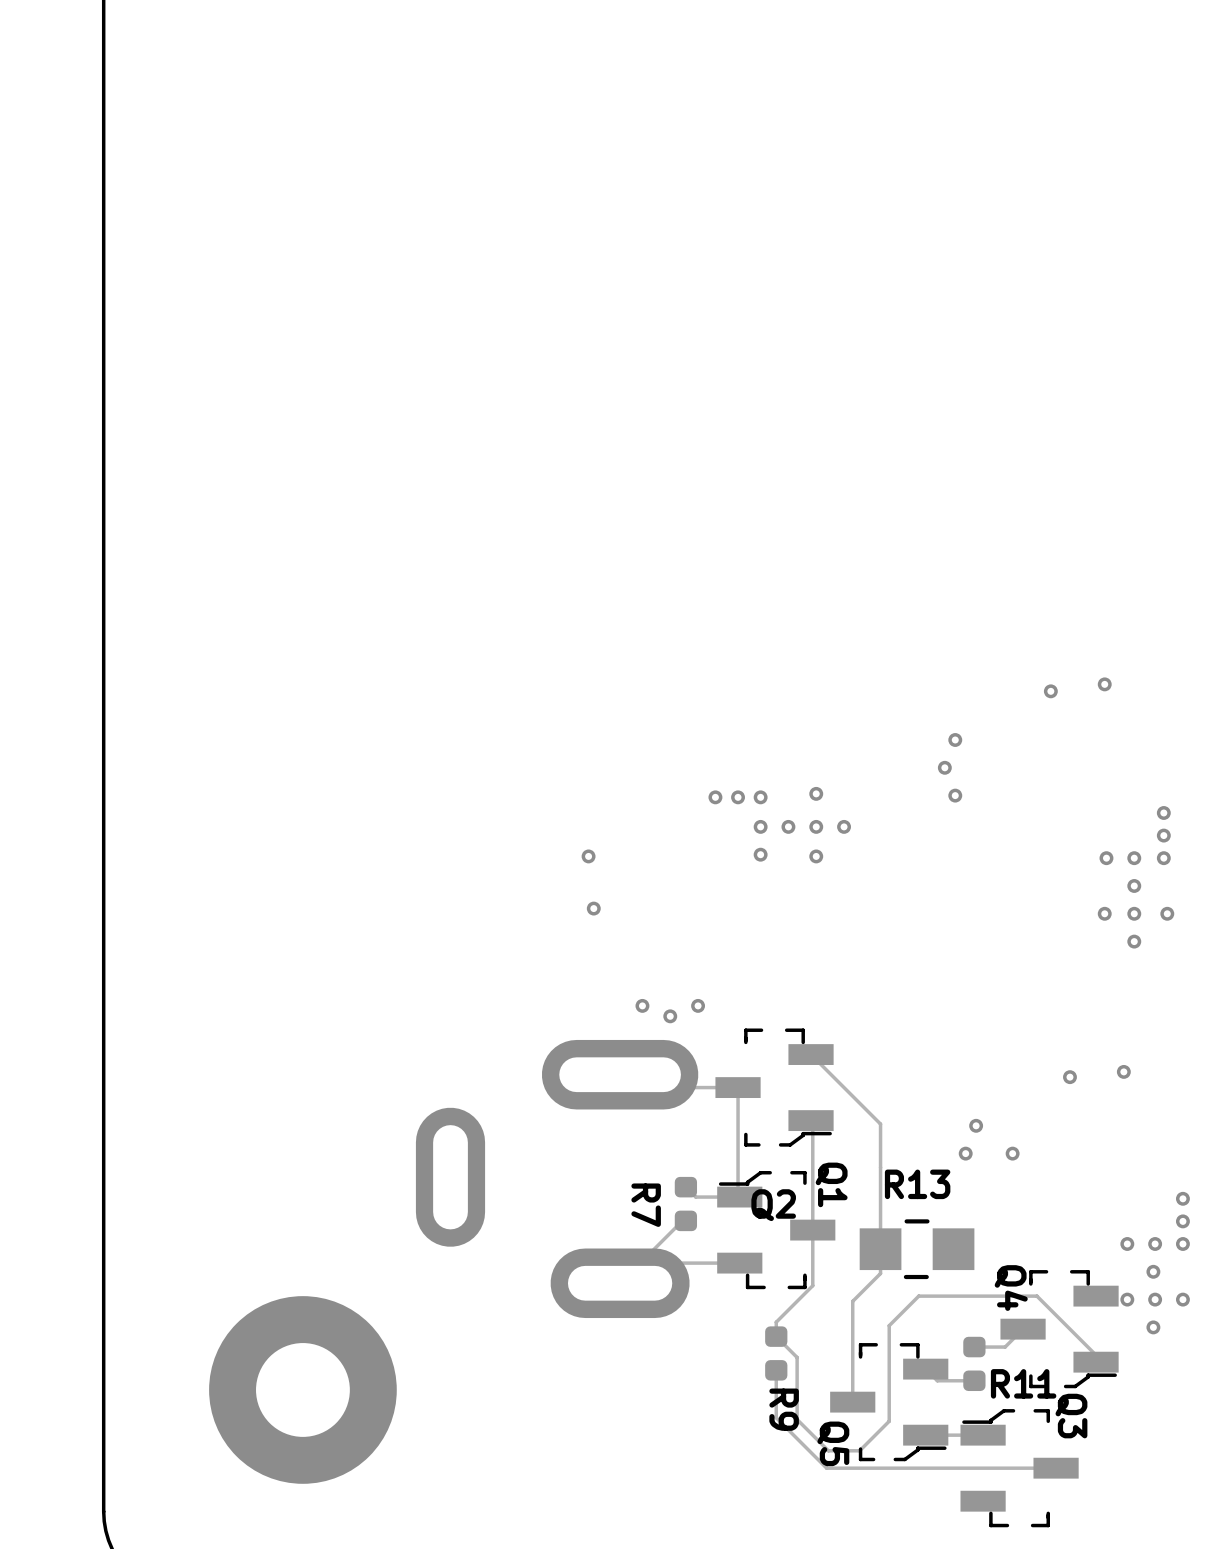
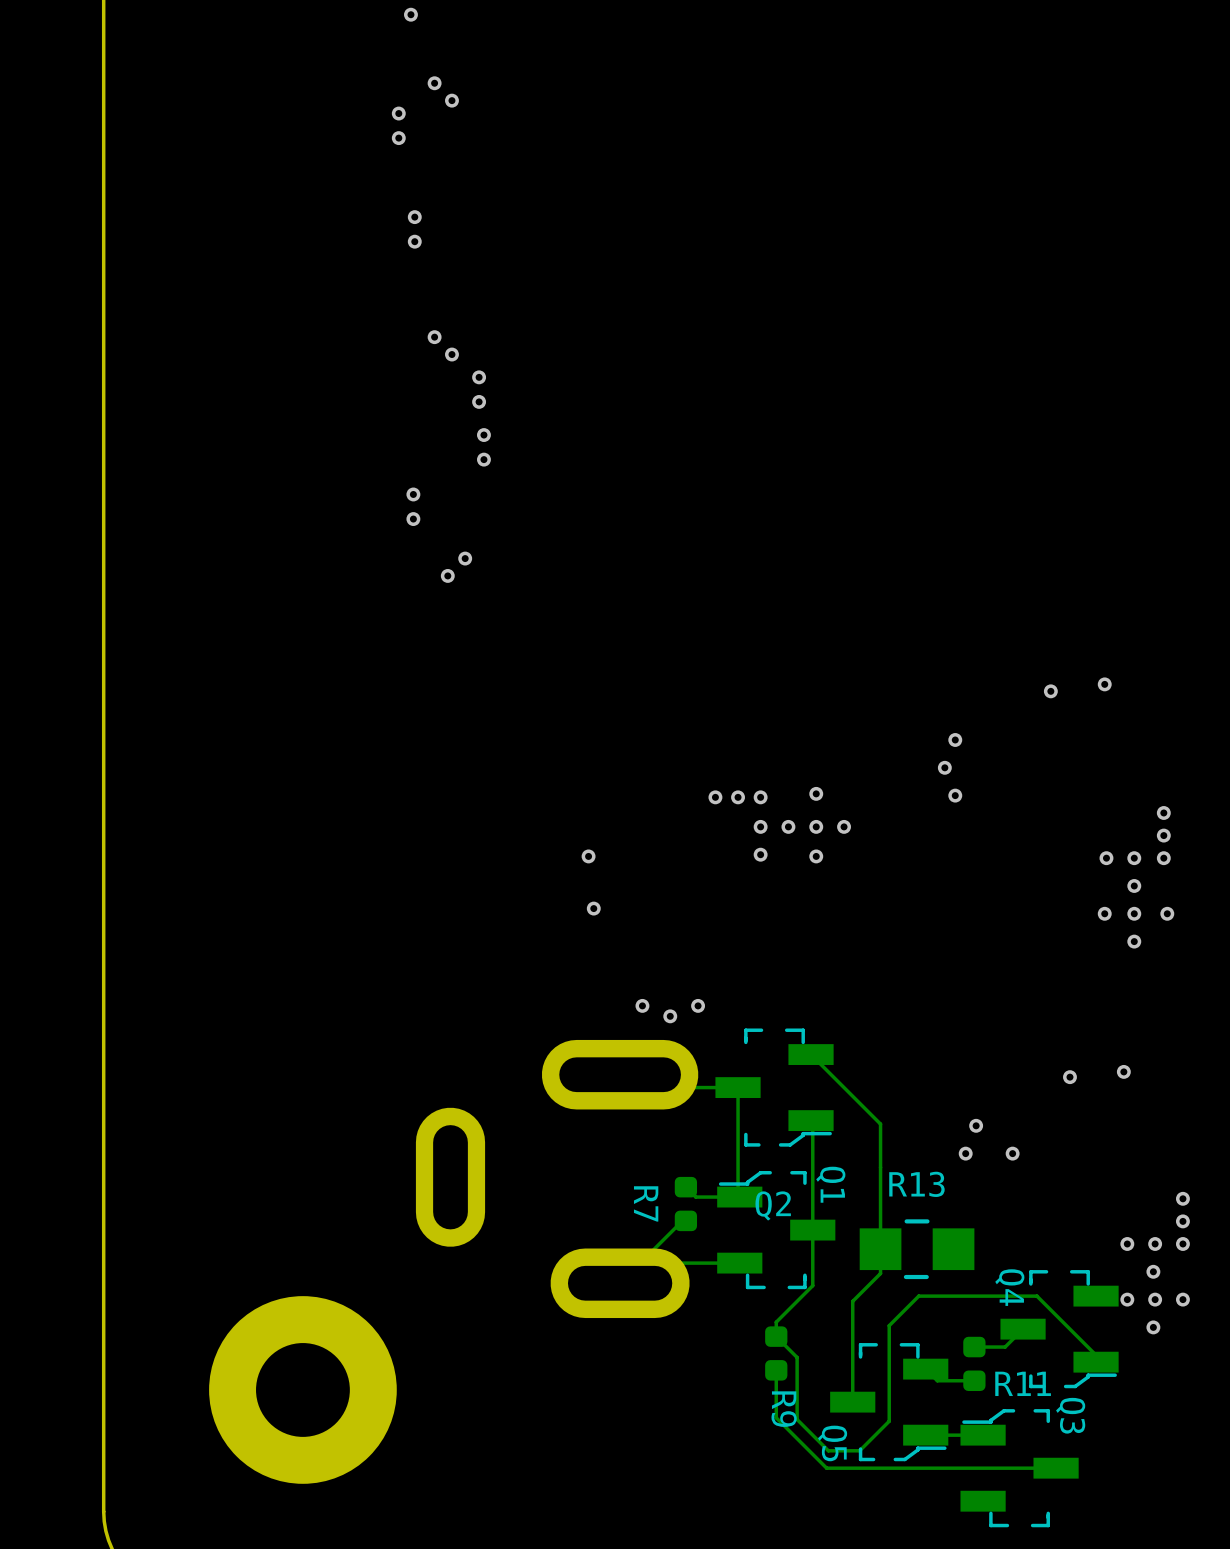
via: none -> (410, 14)
via: none -> (434, 83)
via: none -> (451, 100)
via: none -> (398, 113)
via: none -> (398, 138)
via: none -> (414, 217)
via: none -> (414, 241)
via: none -> (434, 337)
via: none -> (451, 354)
via: none -> (479, 377)
via: none -> (479, 401)
via: none -> (483, 435)
via: none -> (483, 459)
via: none -> (413, 494)
via: none -> (413, 519)
via: none -> (465, 558)
via: none -> (447, 575)

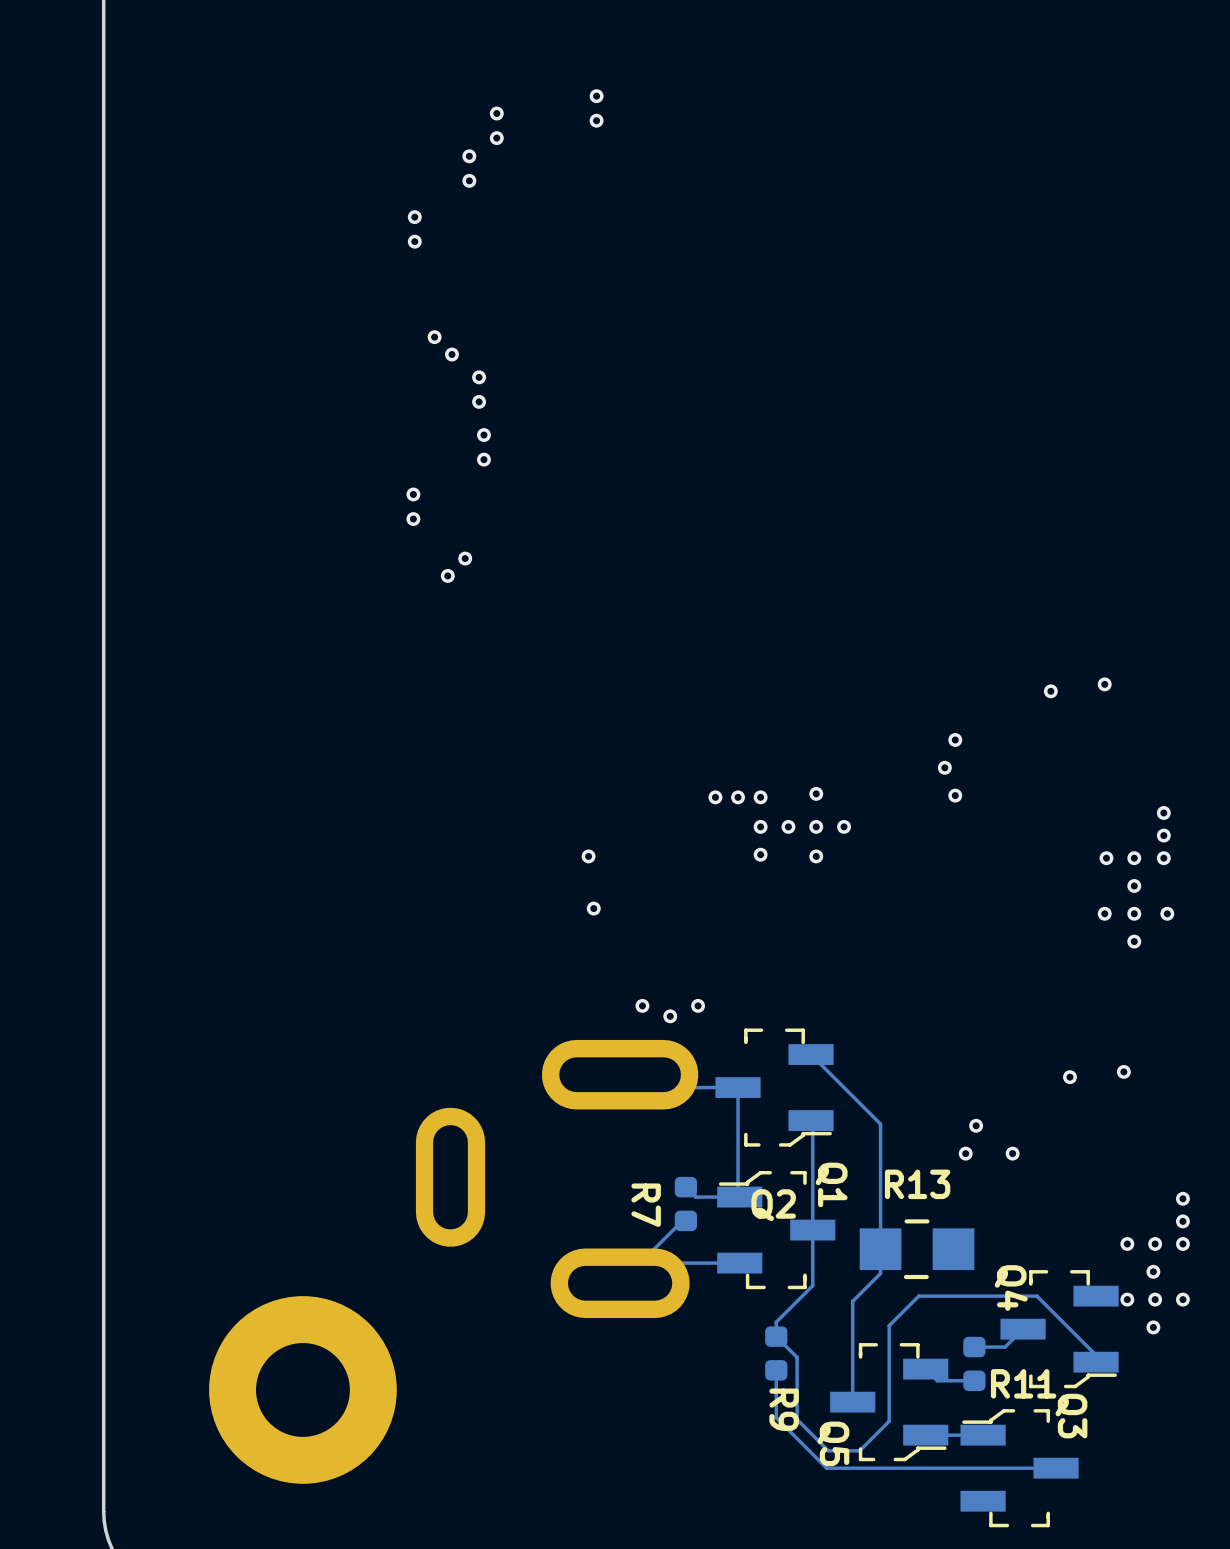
via: (410, 14) -> none
via: (434, 83) -> none
via: none -> (596, 96)
via: (451, 100) -> none
via: (398, 113) -> none
via: none -> (496, 113)
via: none -> (596, 120)
via: (398, 138) -> none
via: none -> (496, 138)
via: none -> (469, 156)
via: none -> (469, 180)

